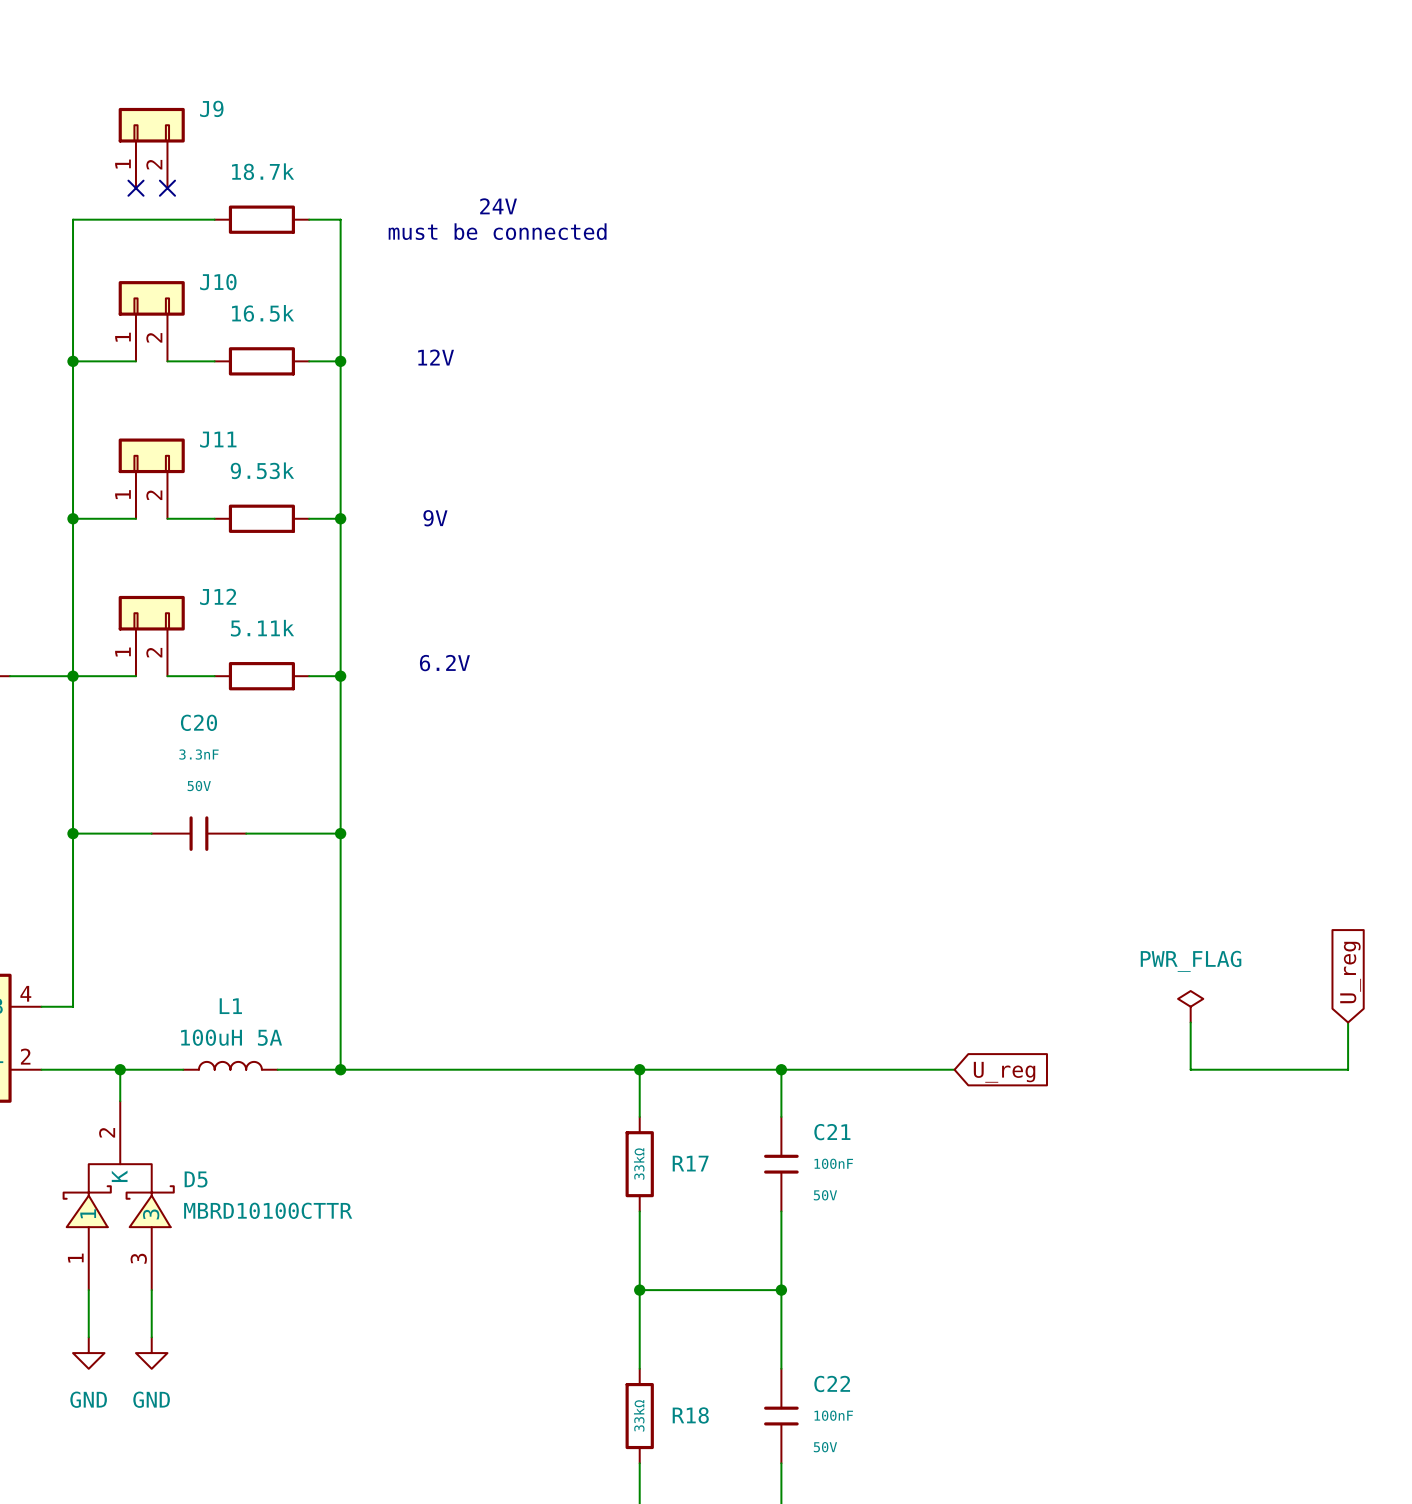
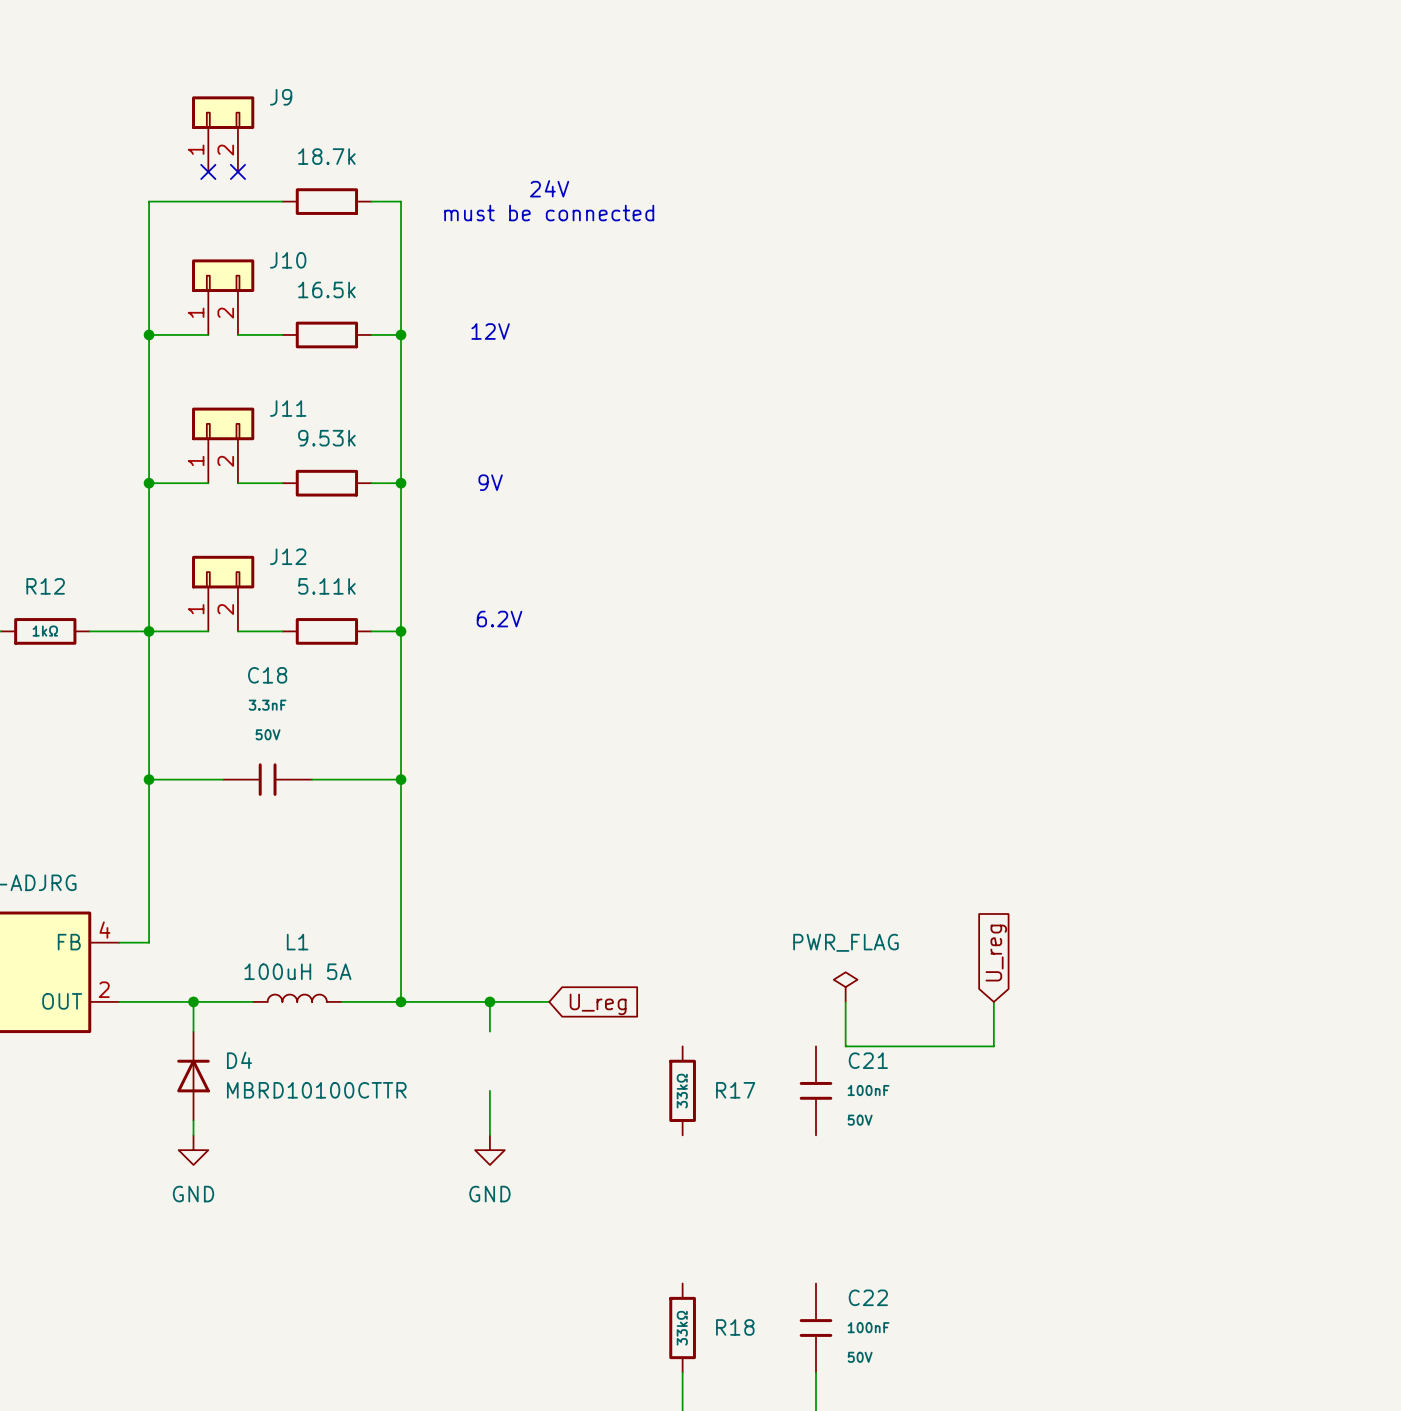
C20 name: C20 (198, 722) -> C18 (267, 675)
global label: U_reg (1350, 972) -> none
power symbol: PWR_FLAG (1190, 1006) -> none
wire: (1190, 1022) (1190, 1069) (1348, 1069) (1348, 1022) -> none
power symbol: none -> PWR_FLAG (845, 987)
wire: none -> (489, 1001) (489, 1031)
junction: none -> (489, 1001)
wire: (498, 1069) (954, 1069) -> none
wire: (639, 1069) (639, 1116) -> (489, 1090) (489, 1135)
junction: (639, 1069) -> none
wire: (781, 1069) (781, 1116) -> none
junction: (781, 1069) -> none
wire: none -> (845, 1001) (845, 1046) (993, 1046) (993, 1001)
global label: none -> U_reg (598, 1004)
global label rotation: 0° (1004, 1072) -> 90° counterclockwise (996, 953)
D4: none -> MBRD10100CTTR (193, 1076)
D5: MBRD10100CTTR (118, 1195) -> none
wire: none -> (193, 1120) (193, 1135)
wire: (639, 1211) (639, 1368) -> none
wire: (781, 1211) (781, 1368) -> none
power symbol: none -> GND (193, 1150)
power symbol: none -> GND (489, 1150)
wire: (88, 1290) (88, 1337) -> none
wire: (151, 1290) (151, 1337) -> none
wire: (639, 1290) (781, 1290) -> none
junction: (639, 1290) -> none
junction: (781, 1290) -> none
power symbol: GND (88, 1353) -> none
power symbol: GND (151, 1353) -> none

